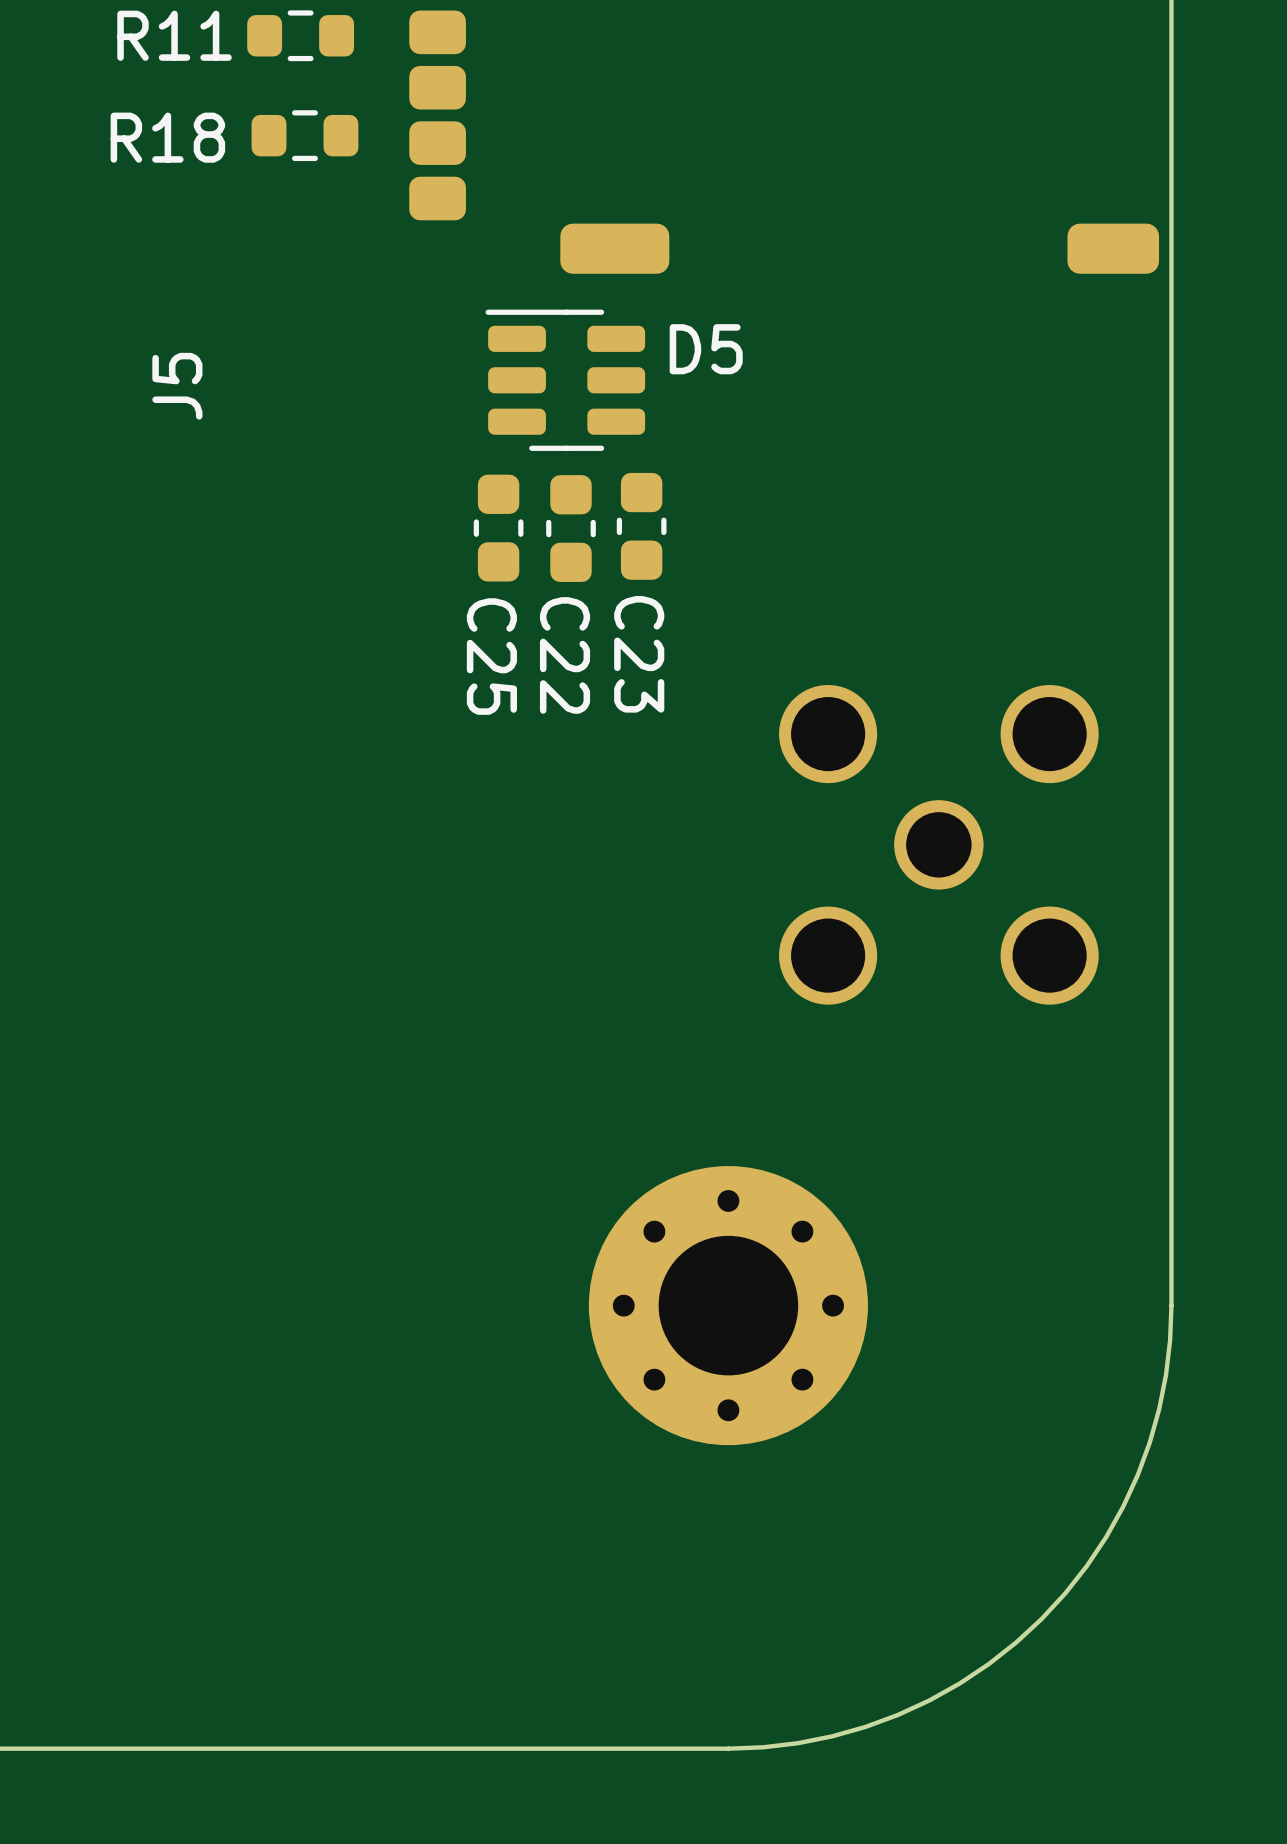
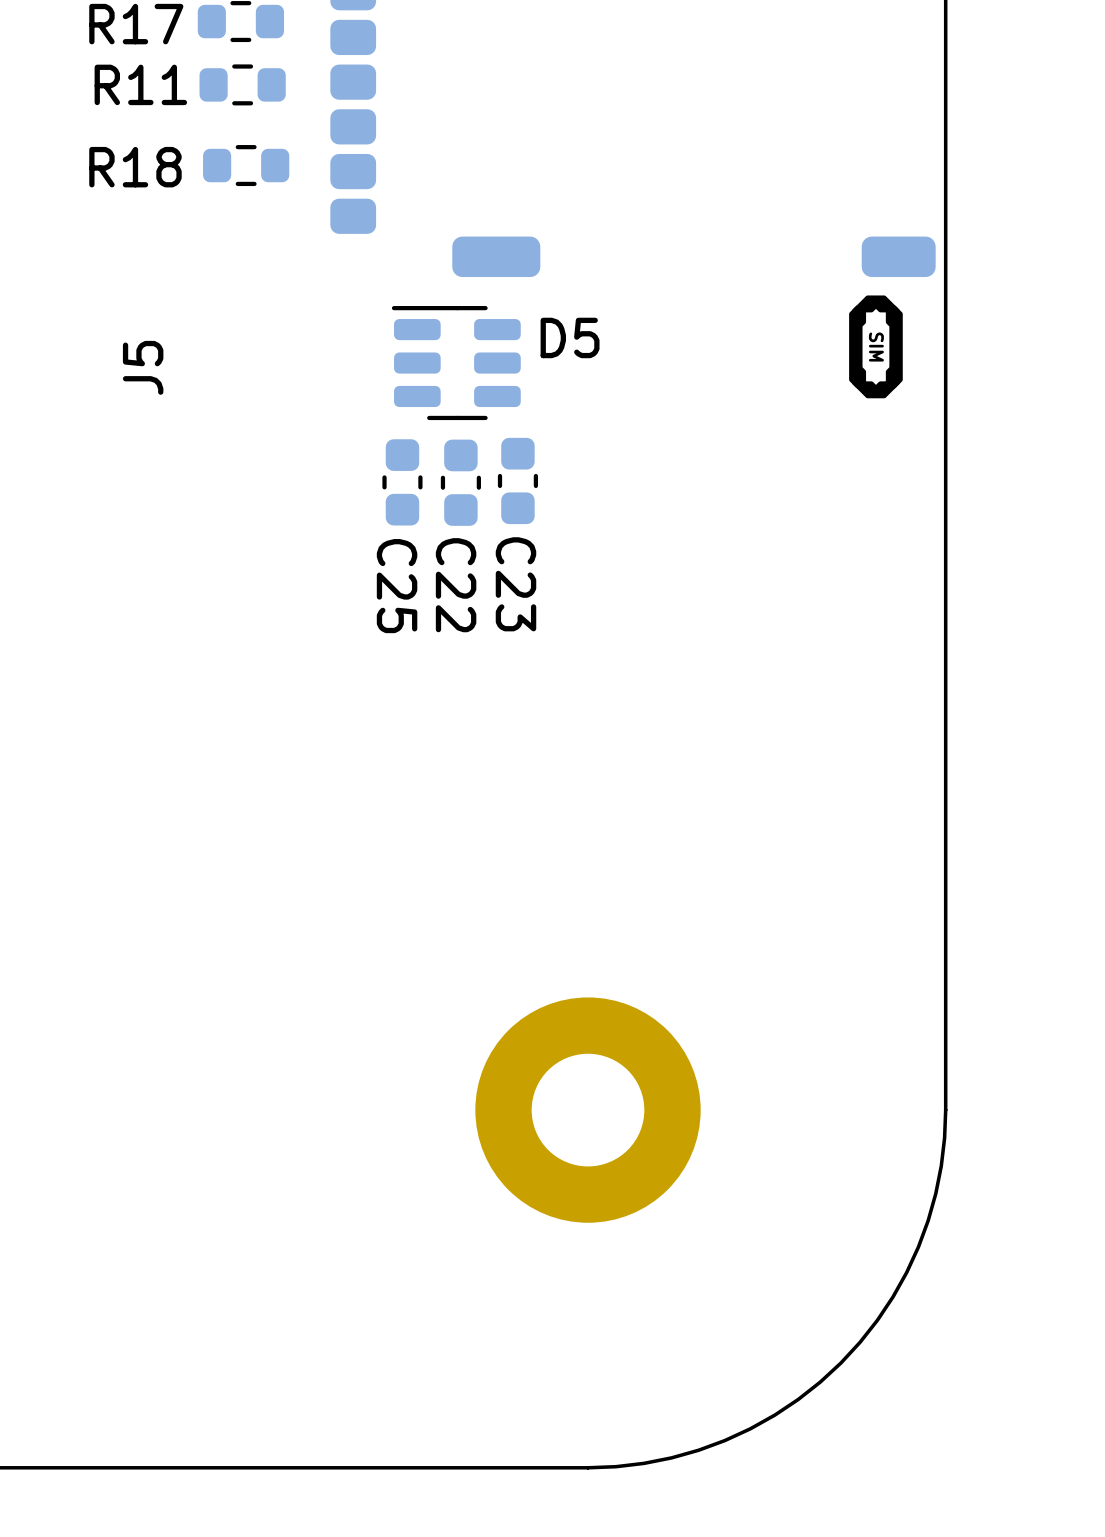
drawing: none -> [849, 295, 903, 399]
text: none -> SIM (876, 347)
part: (938, 844) -> none
part footprint: [588, 1166, 868, 1446] -> [475, 997, 701, 1223]

